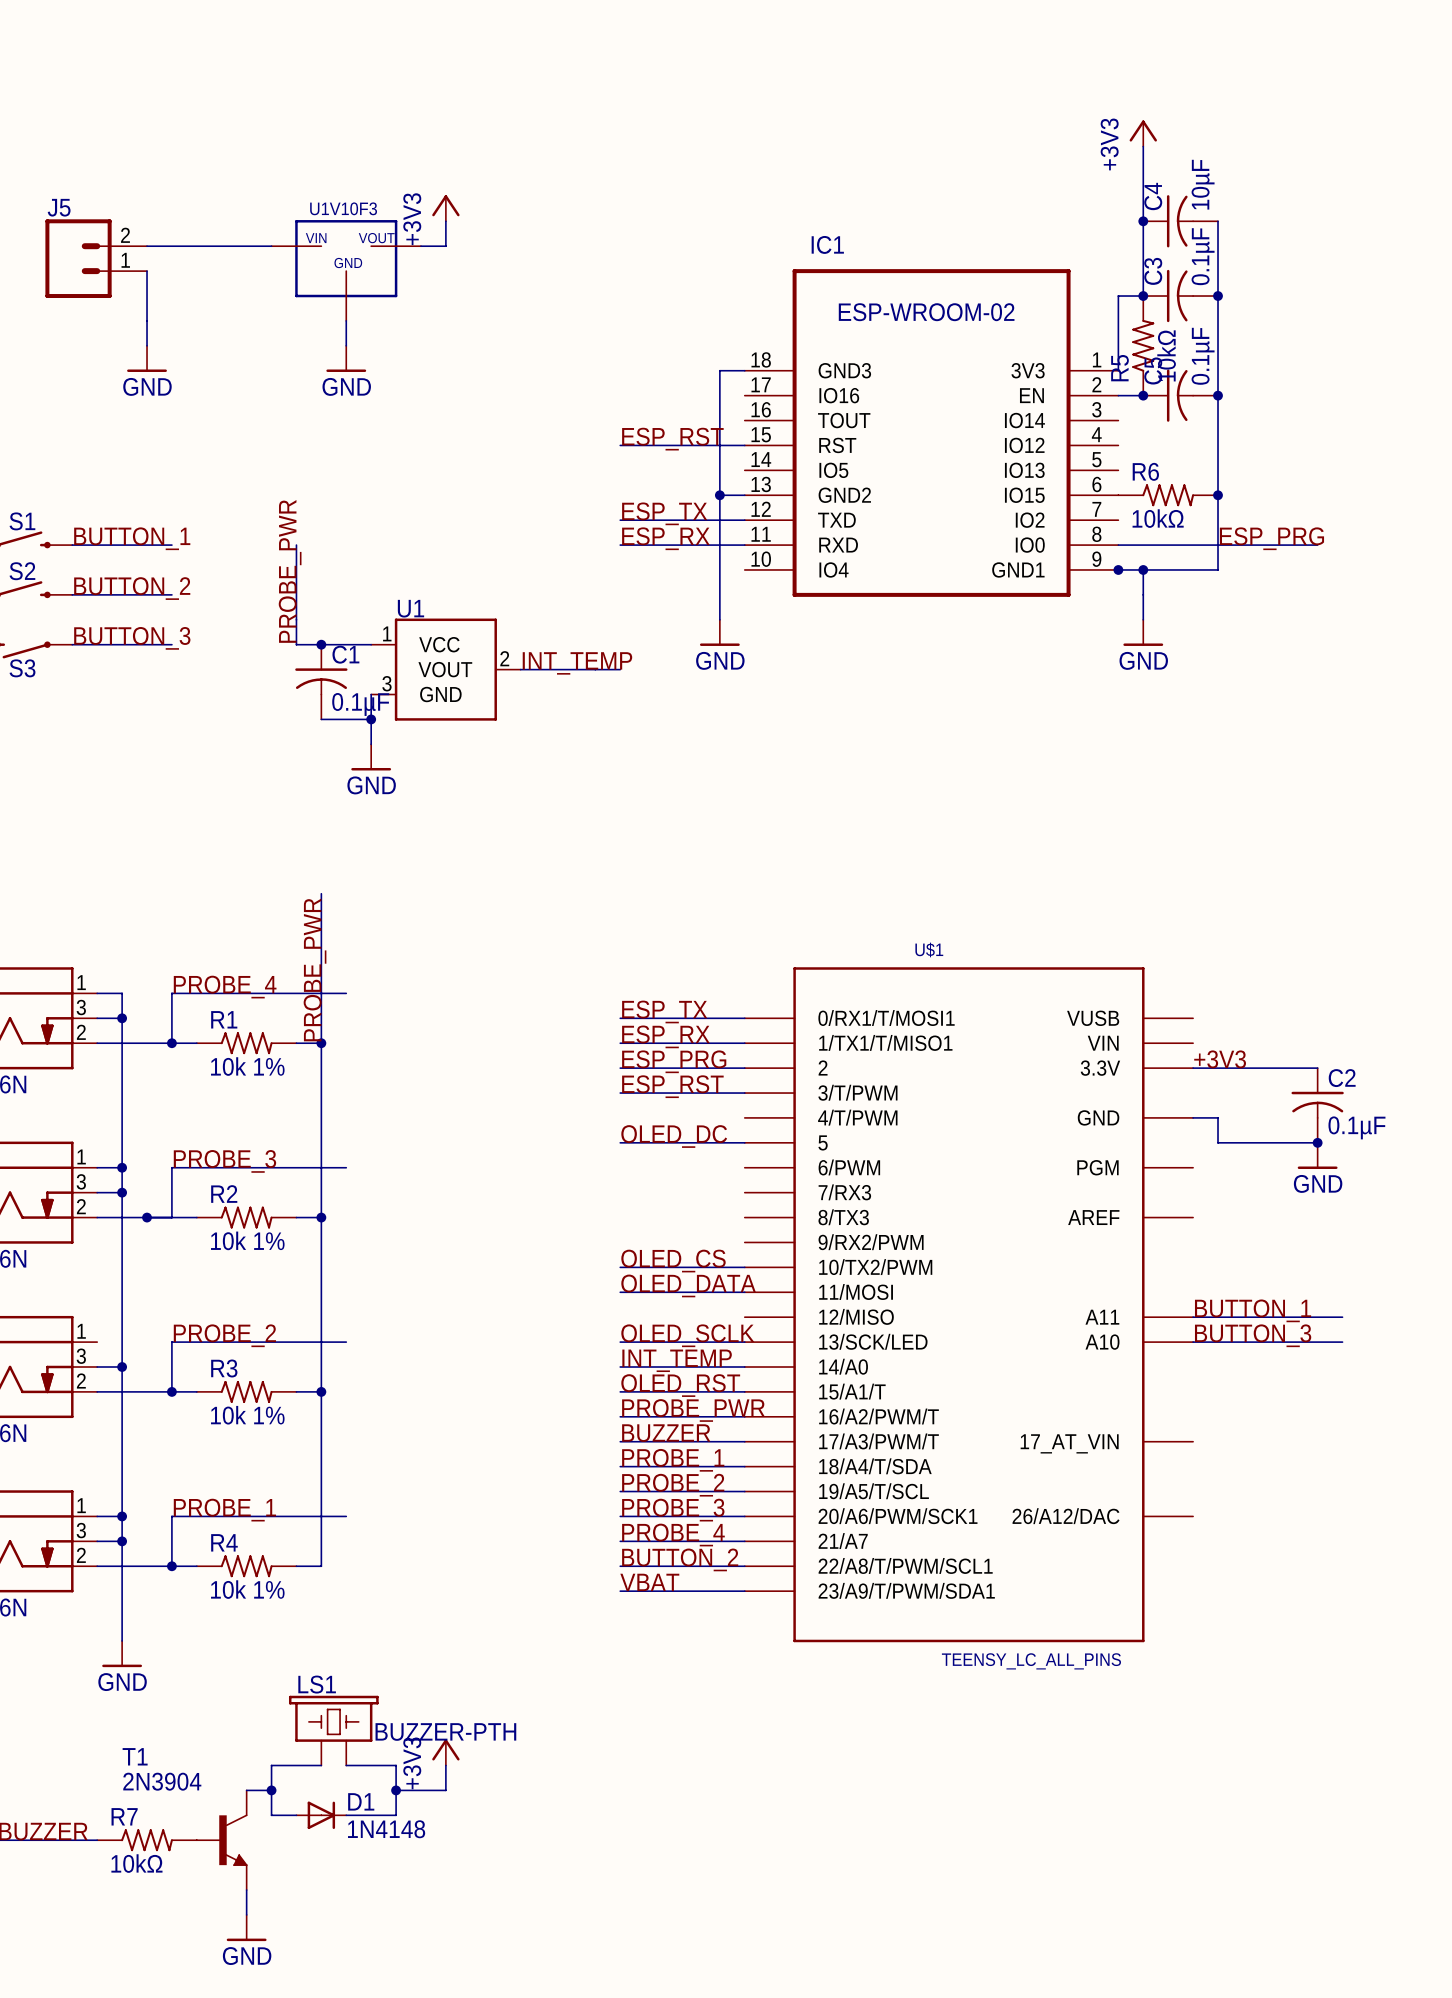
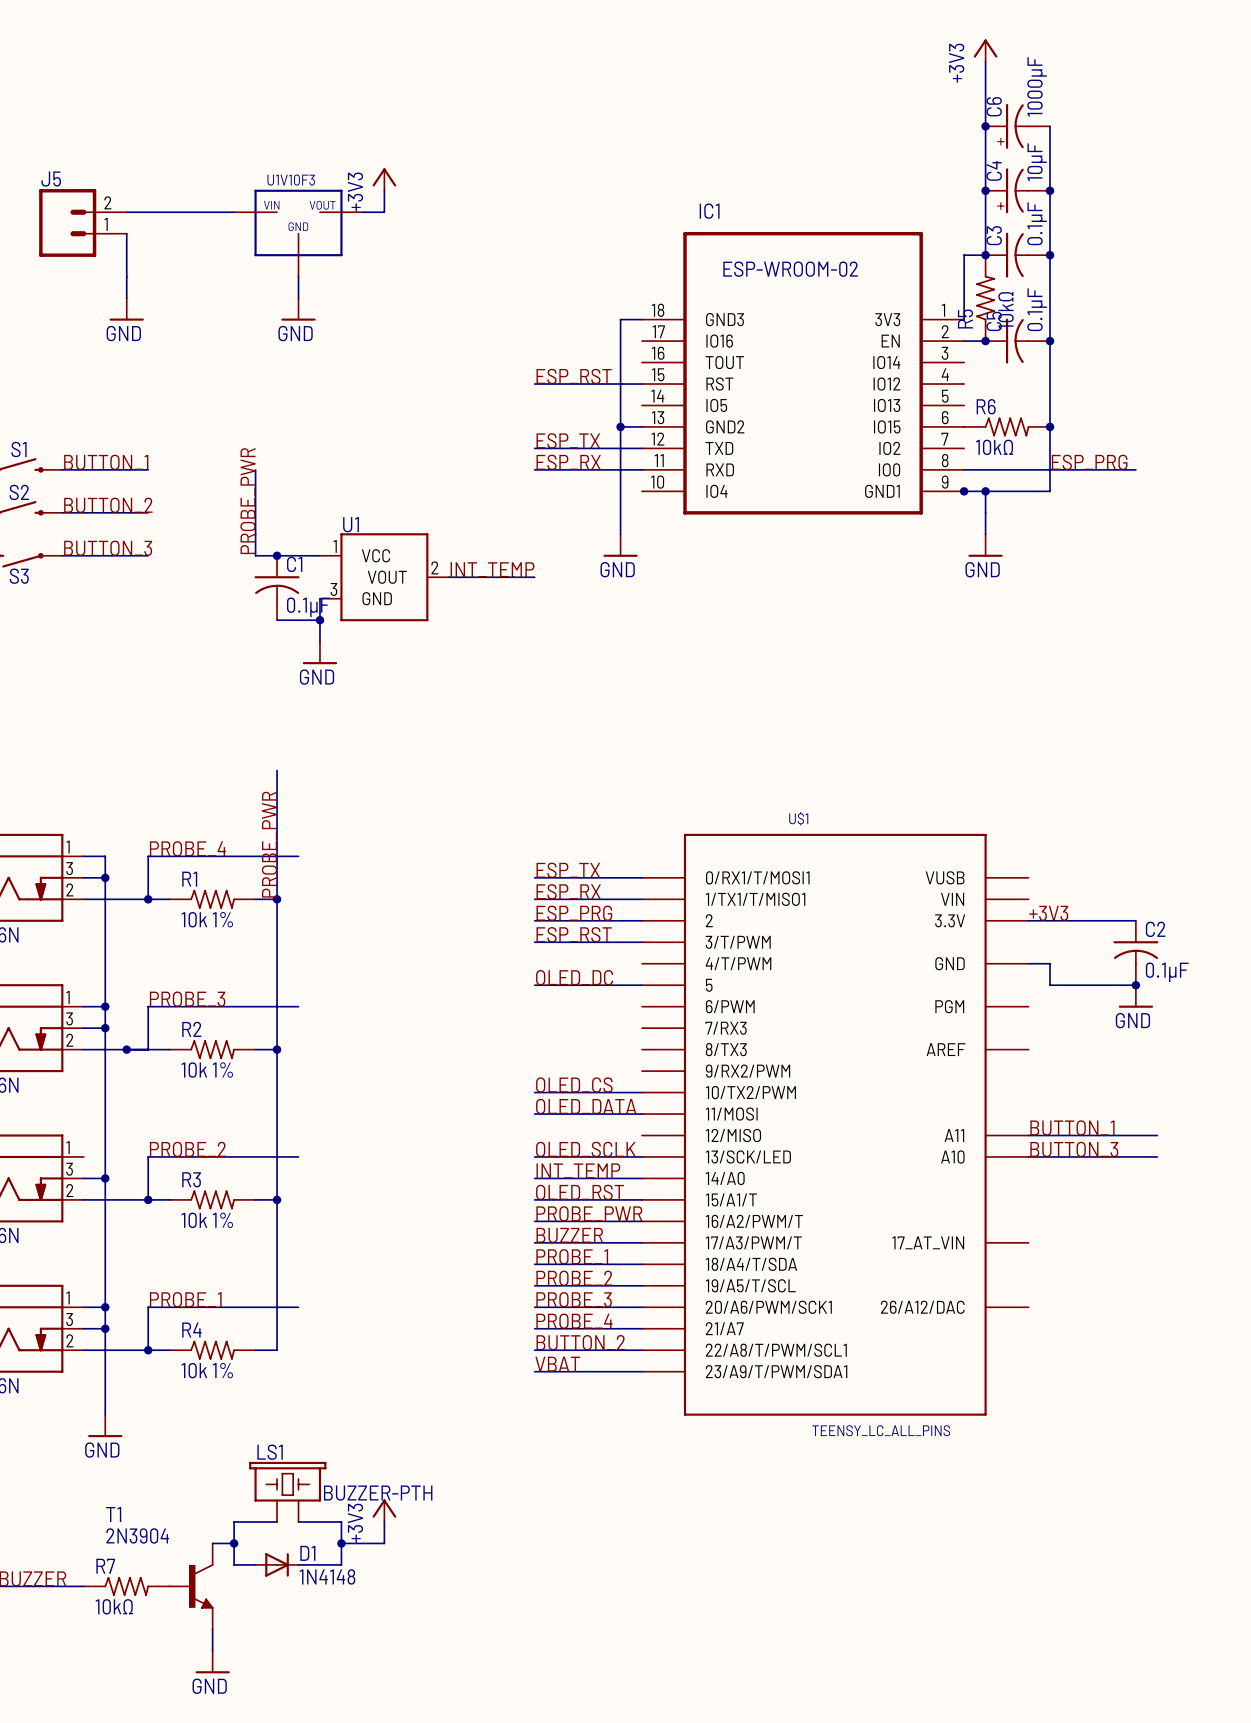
wire: none -> (985, 61) (985, 126)
power symbol position: +3V3 (1143, 133) -> +3V3 (985, 50)
junction: none -> (985, 126)
C6: none -> 1000µF (1017, 126)
wire: none -> (1050, 126) (1050, 190)
C4 symbol: [1143, 195, 1219, 248] -> [985, 168, 1051, 214]
junction: none -> (1050, 190)

